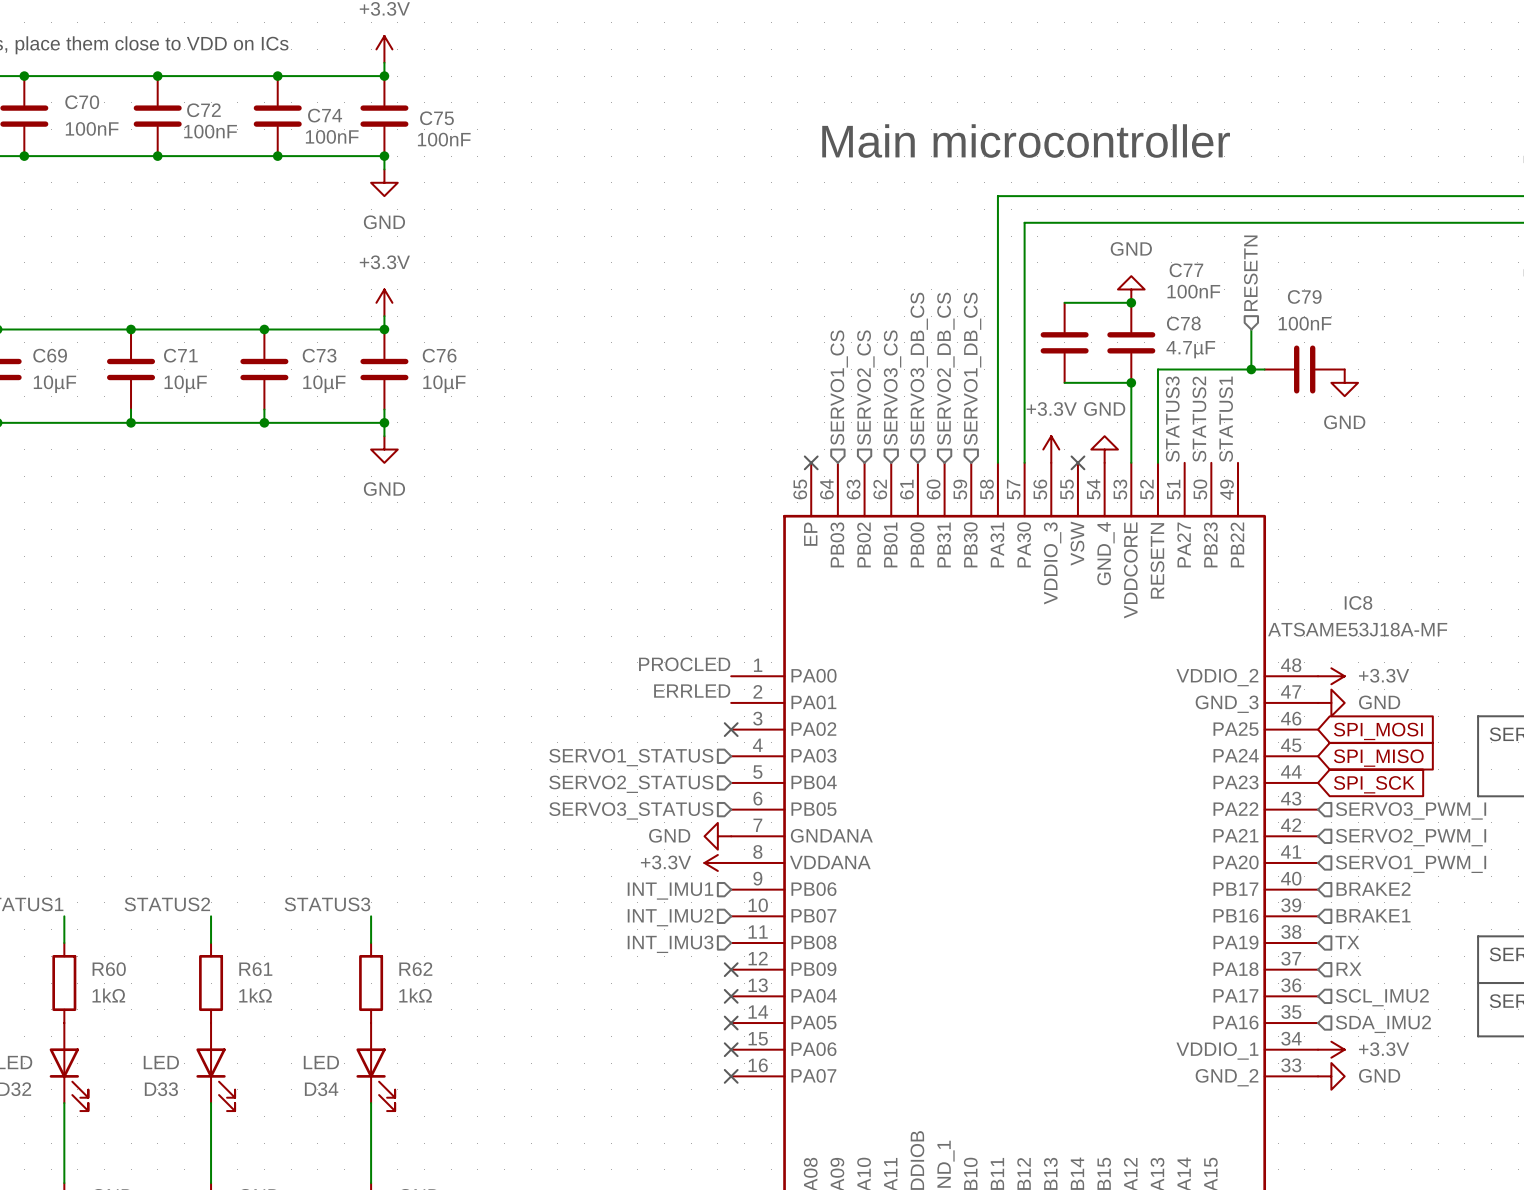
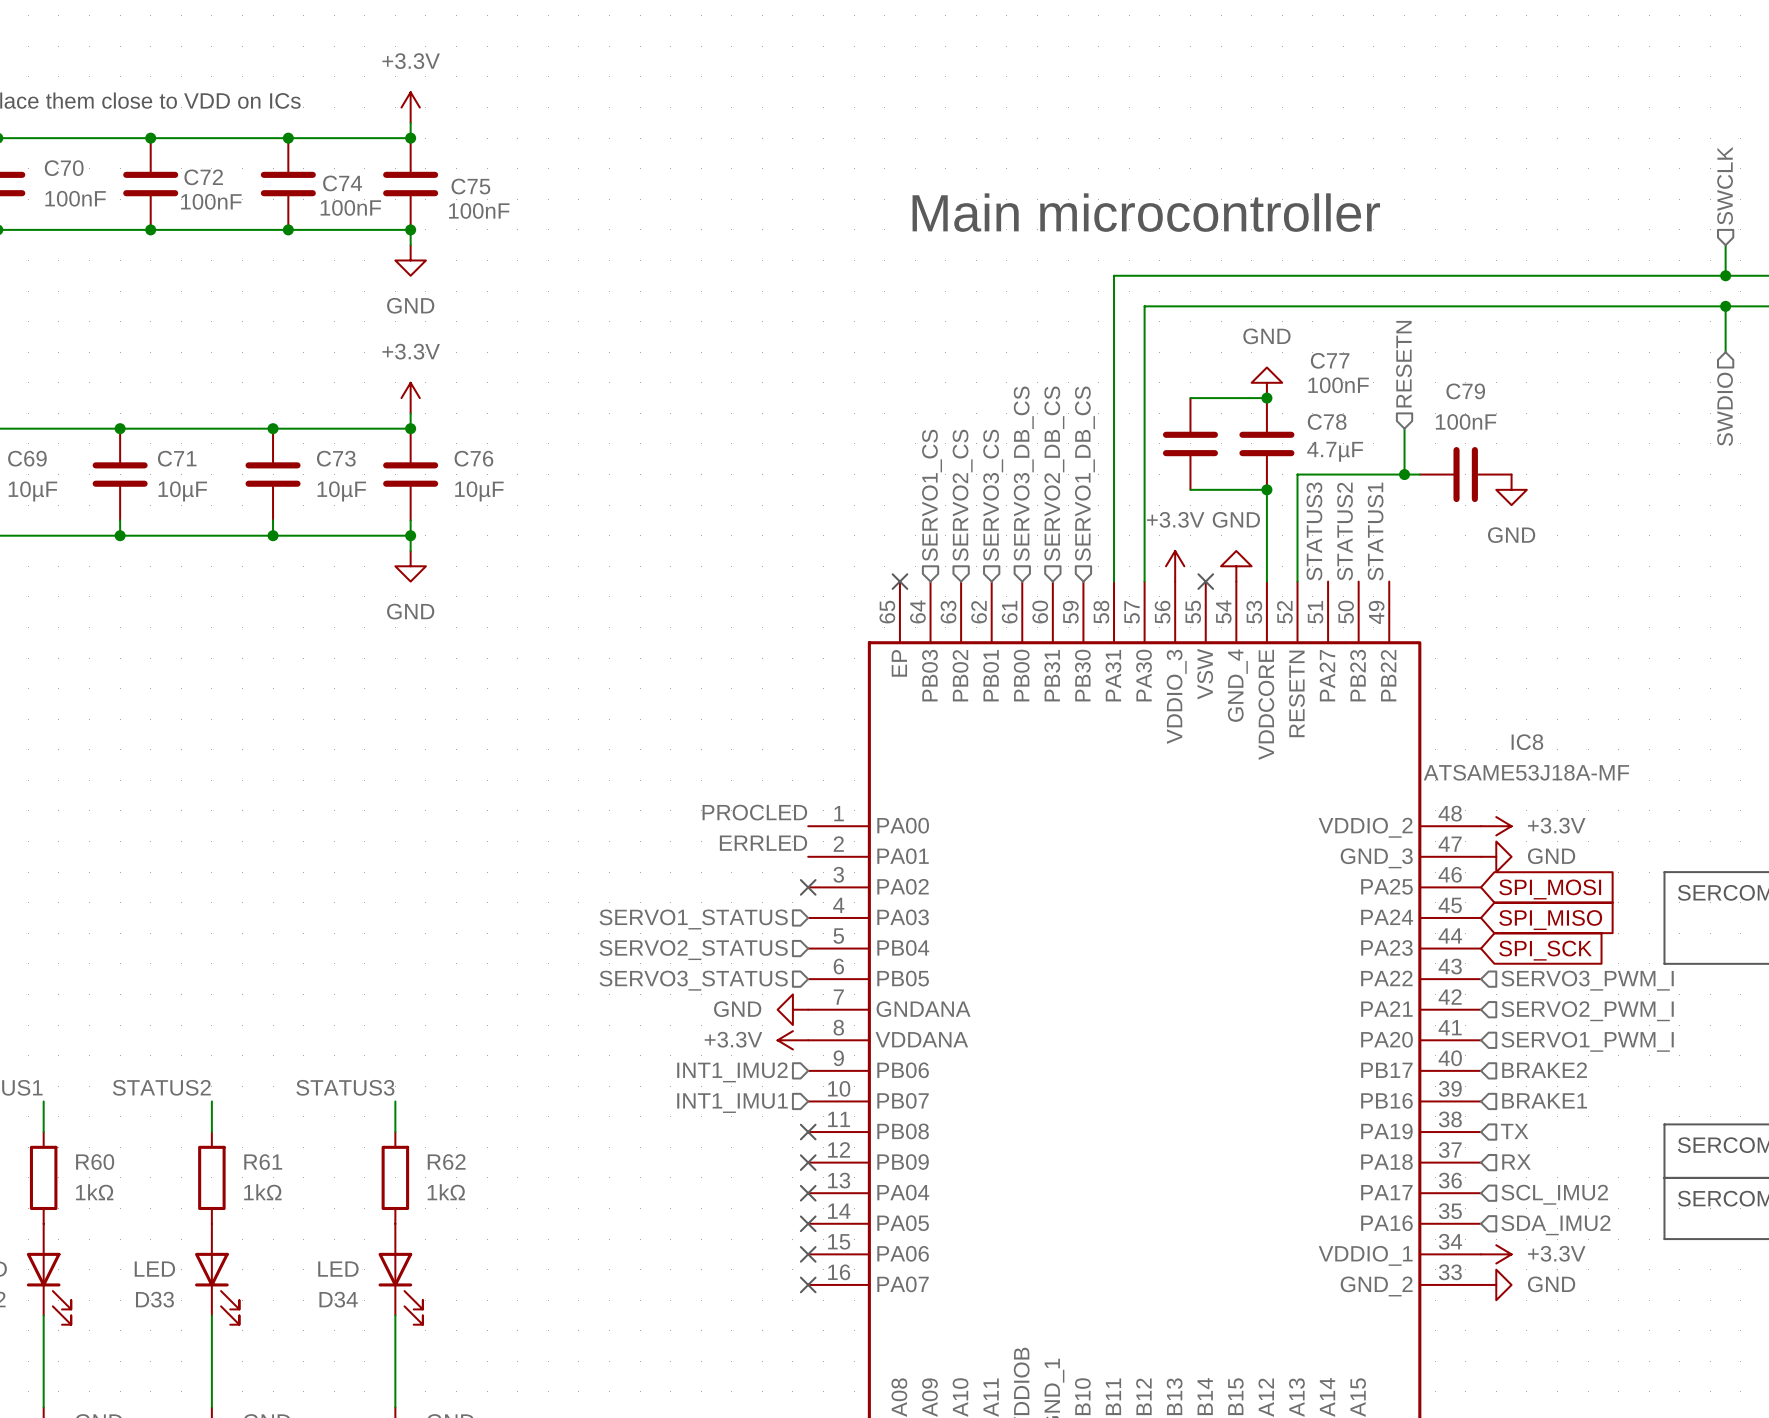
hierarchical label: INT_IMU1 (670, 891) -> INT1_IMU2 (732, 1072)
hierarchical label: INT_IMU2 (670, 917) -> INT1_IMU1 (732, 1103)
no-connect mark: none -> (808, 1132)
hierarchical label: INT_IMU3 (670, 944) -> none

